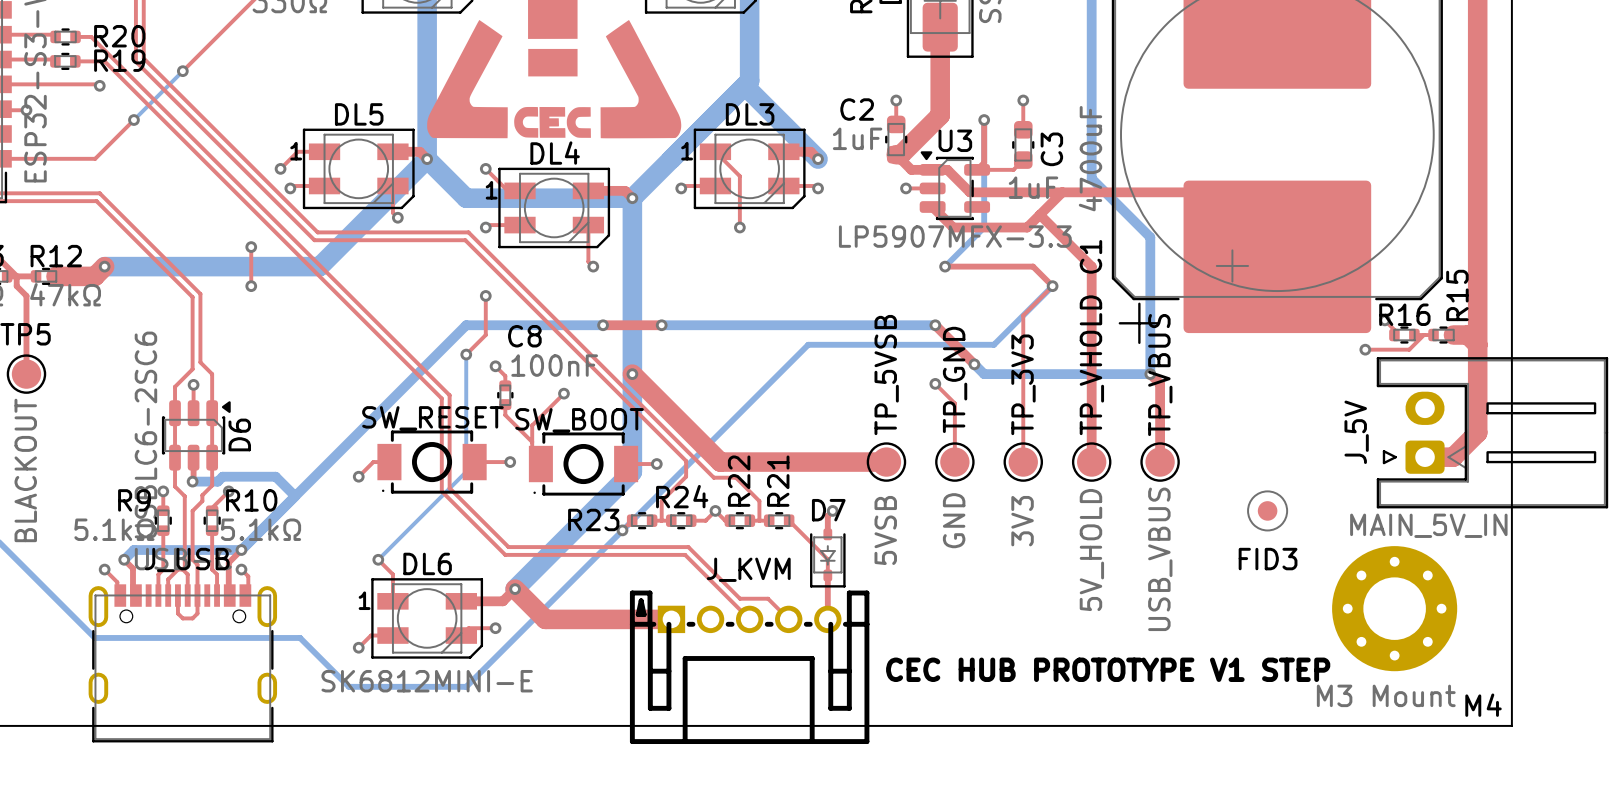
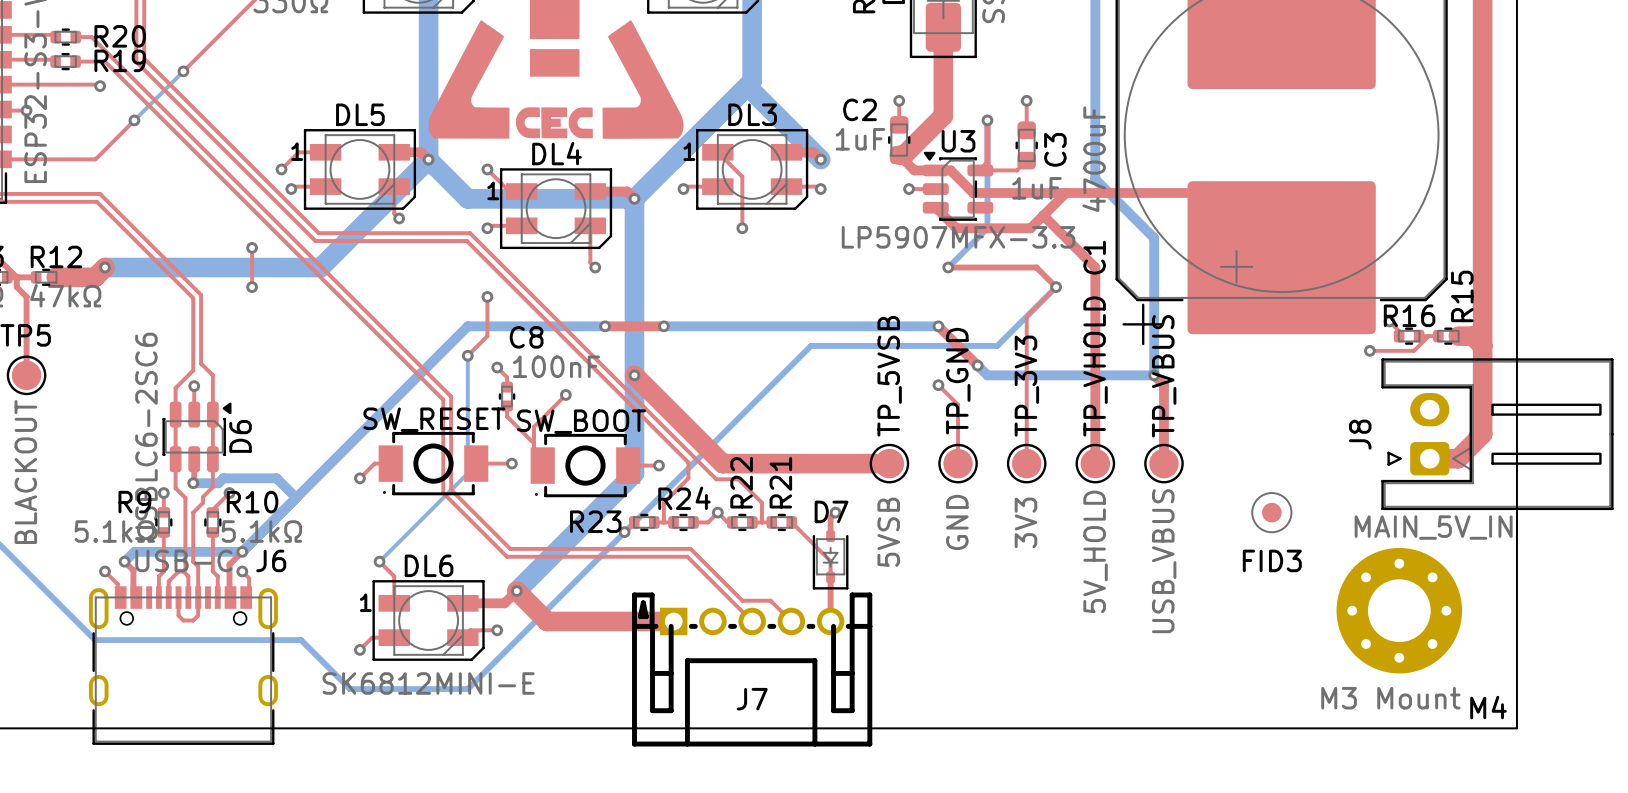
J_5V name: J_5V (1356, 432) -> J8 (1360, 434)
J_USB name: J_USB (187, 559) -> J6 (271, 560)
J_KVM name: J_KVM (748, 569) -> J7 (752, 699)
text: CEC HUB PROTOTYPE V1 STEP (1108, 669) -> none

